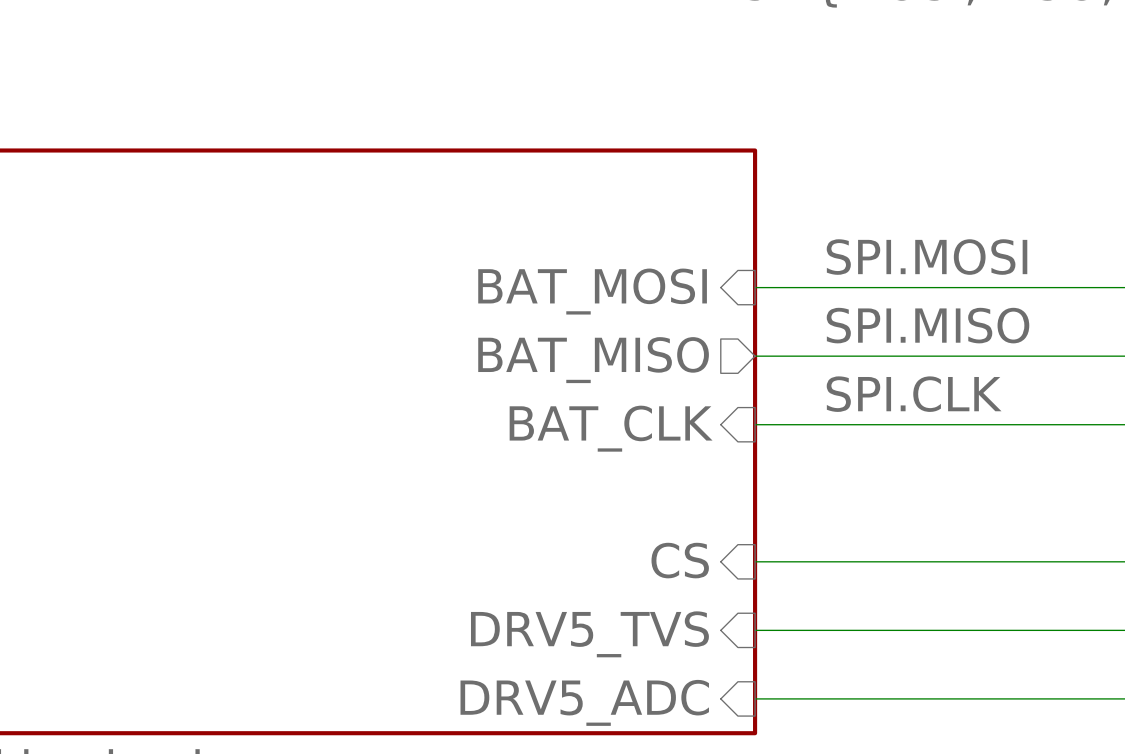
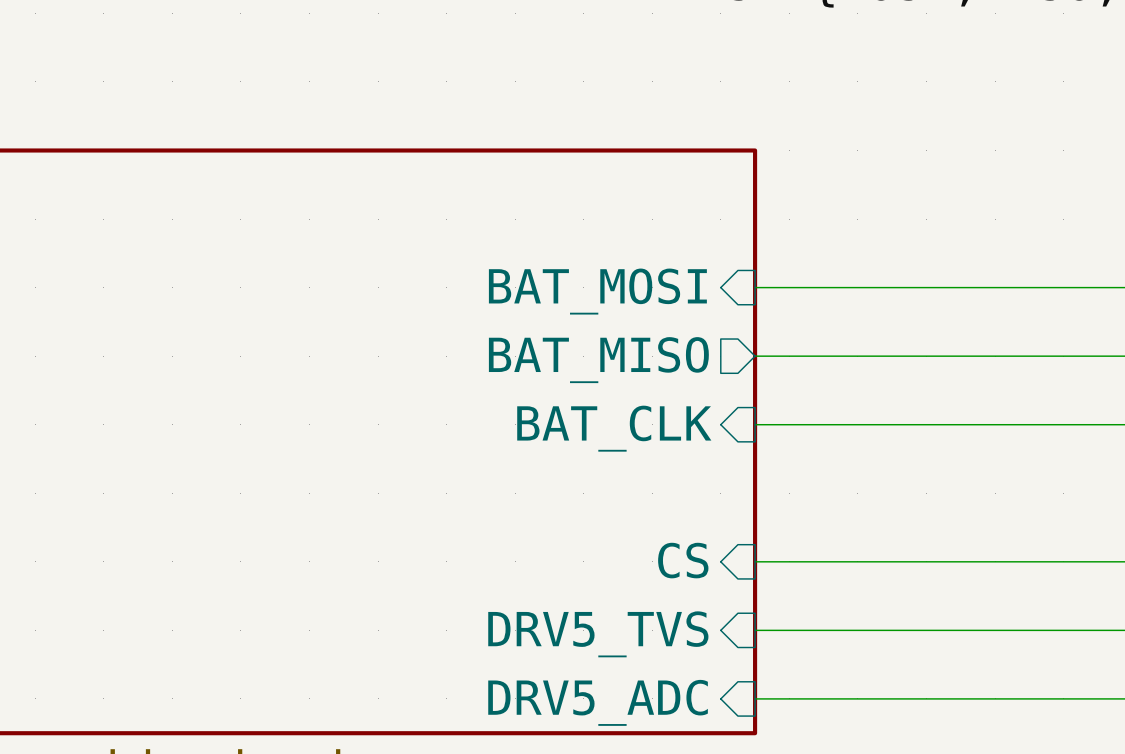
label: SPI.MOSI (927, 257) -> none
label: SPI.MISO (927, 325) -> none
label: SPI.CLK (914, 394) -> none

